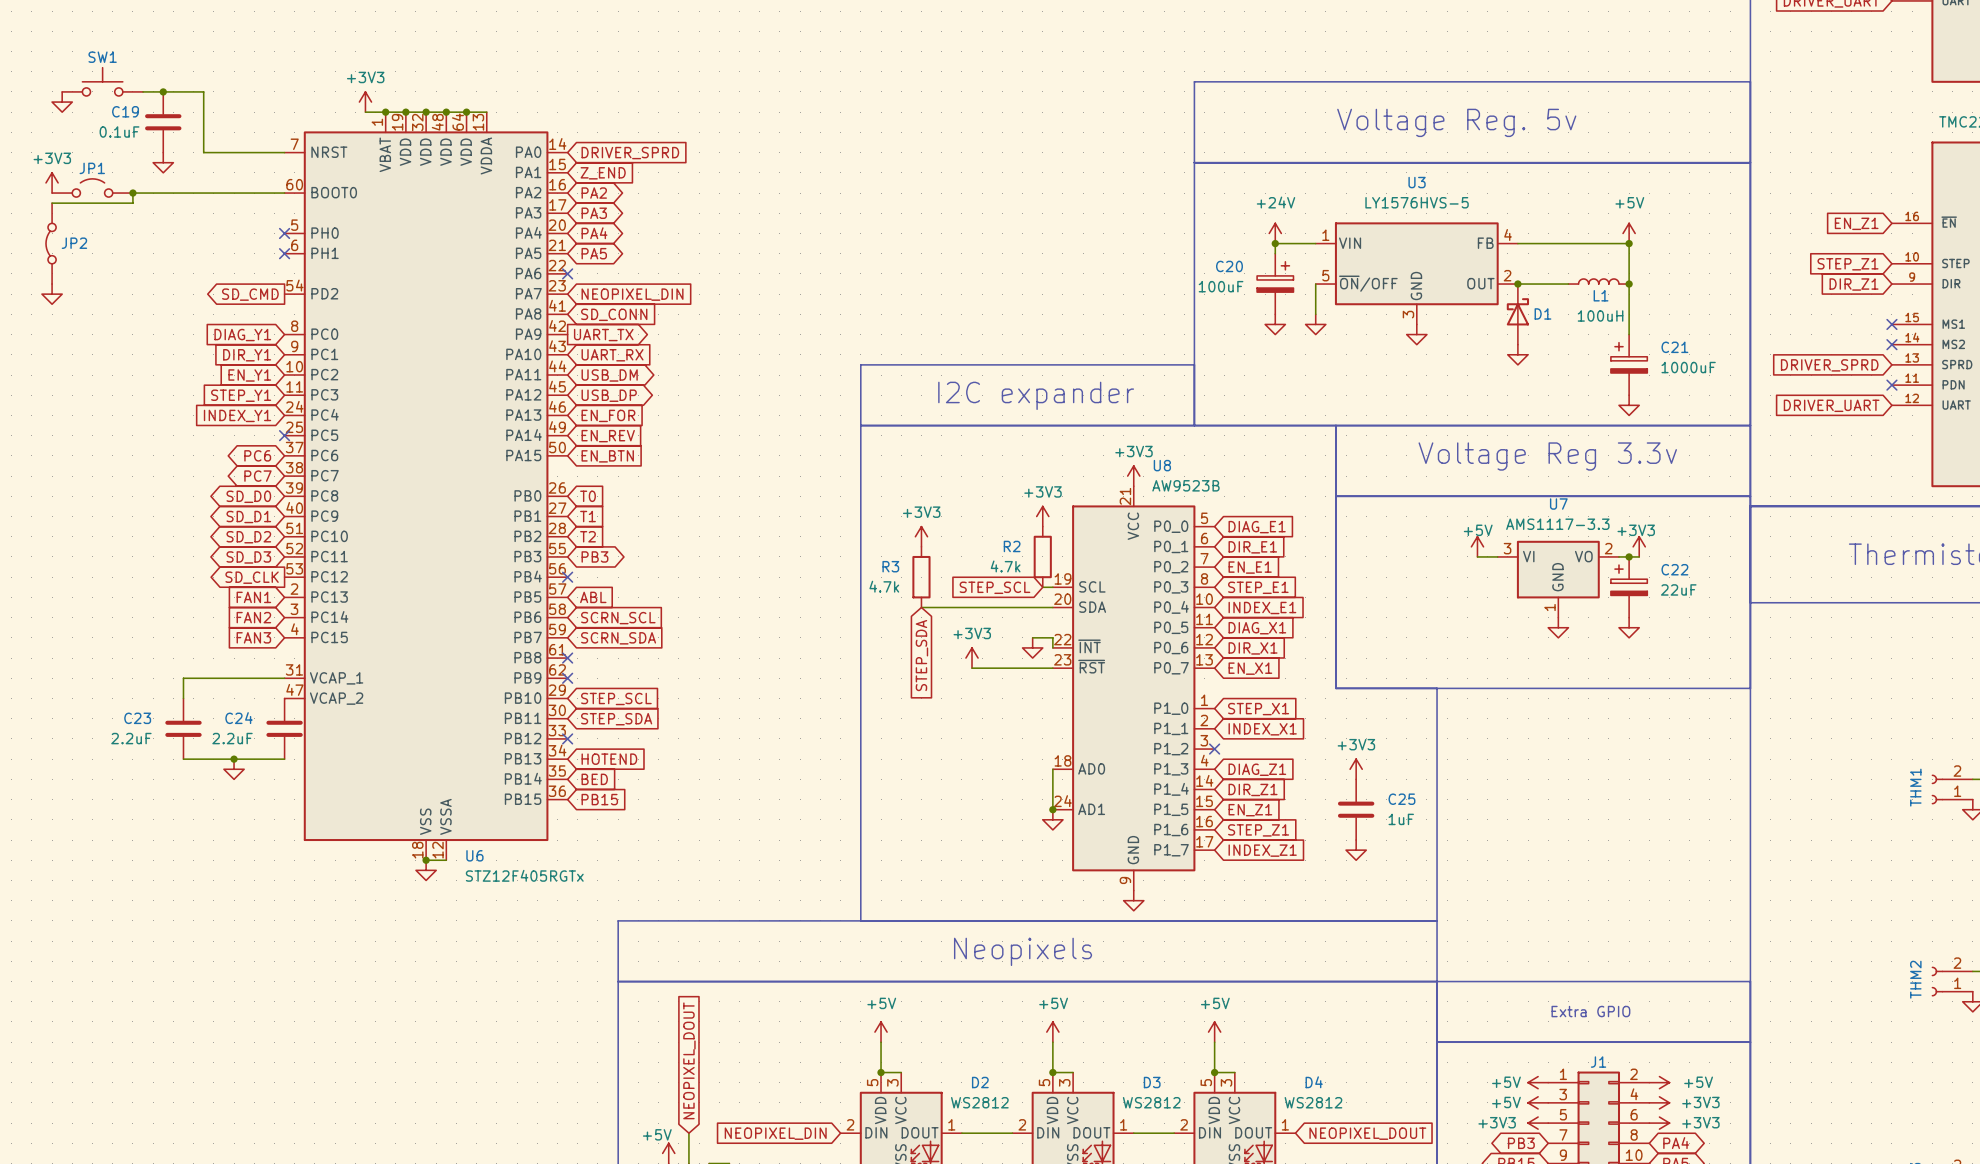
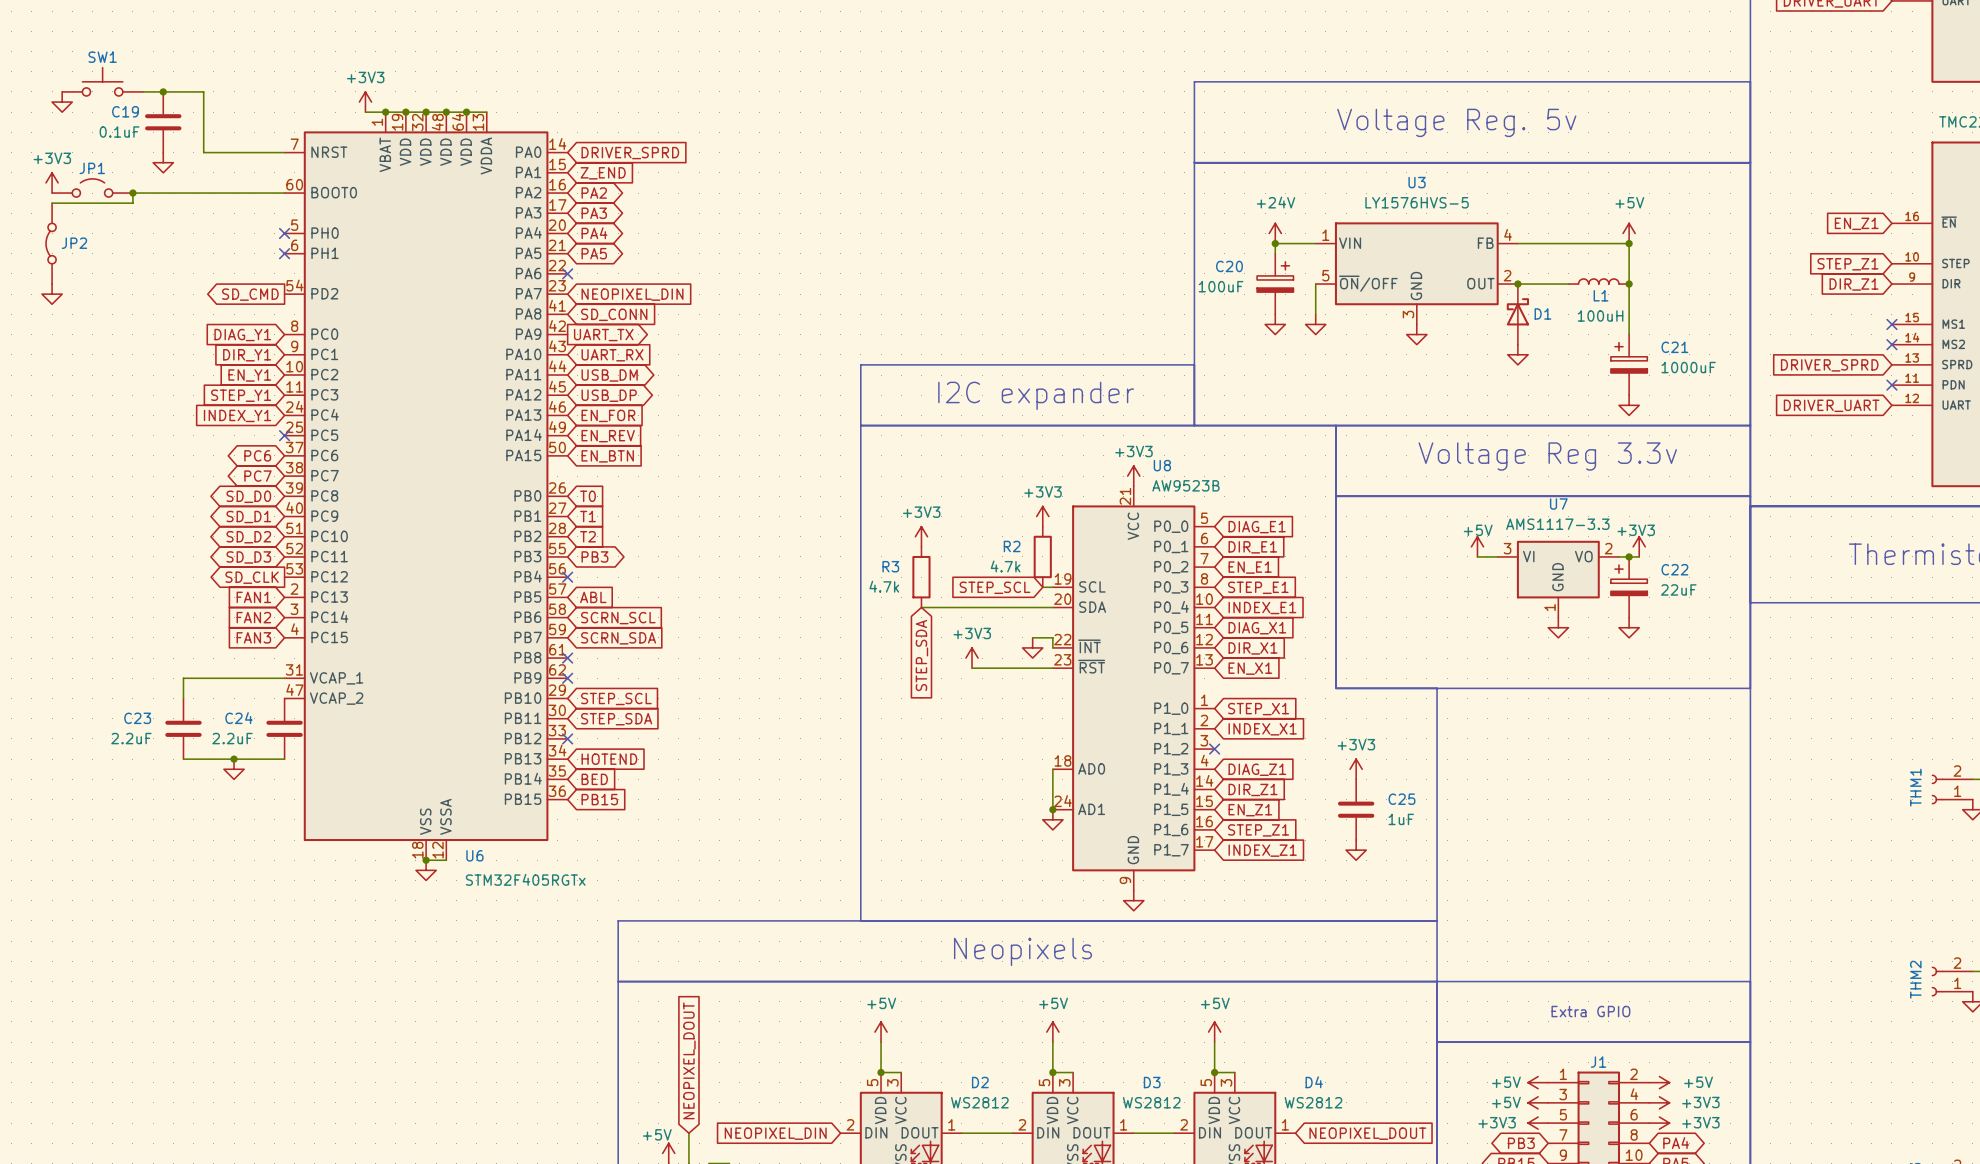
U6 value: STZ12F405RGTx (524, 875) -> STM32F405RGTx (525, 879)

